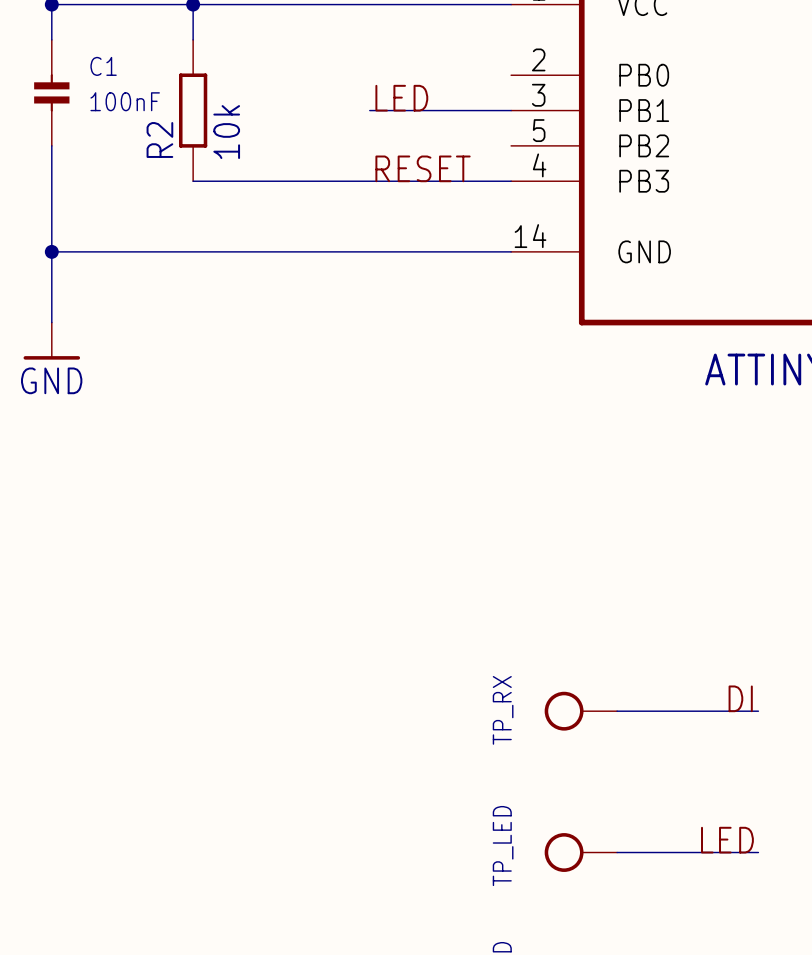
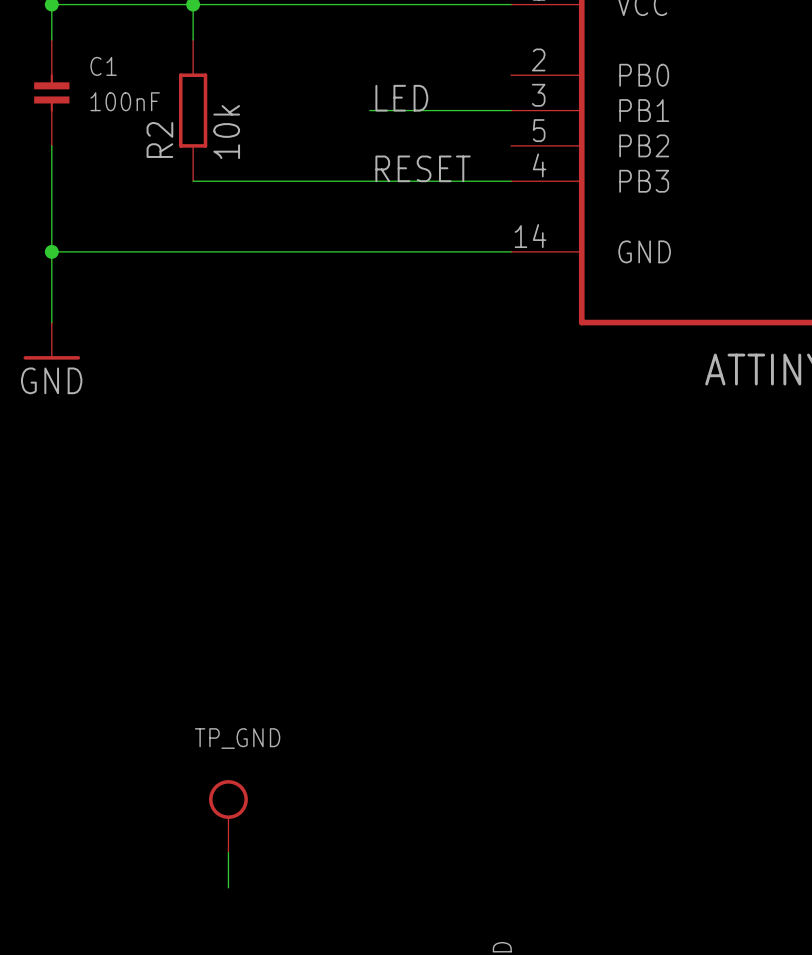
label: DI (740, 698) -> none
TP_RX: (580, 711) -> none
wire: (617, 711) (758, 711) -> none
TP_GND: none -> (228, 816)
label: LED (727, 840) -> none
wire: none -> (228, 852) (228, 887)
TP_LED: (580, 852) -> none
wire: (617, 852) (758, 852) -> none

